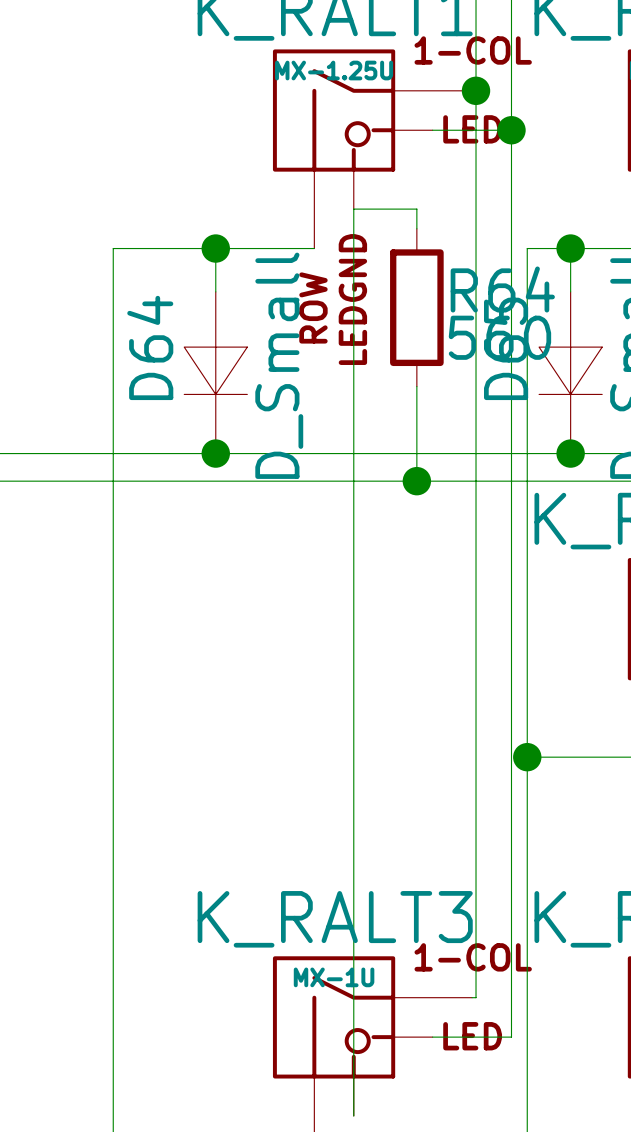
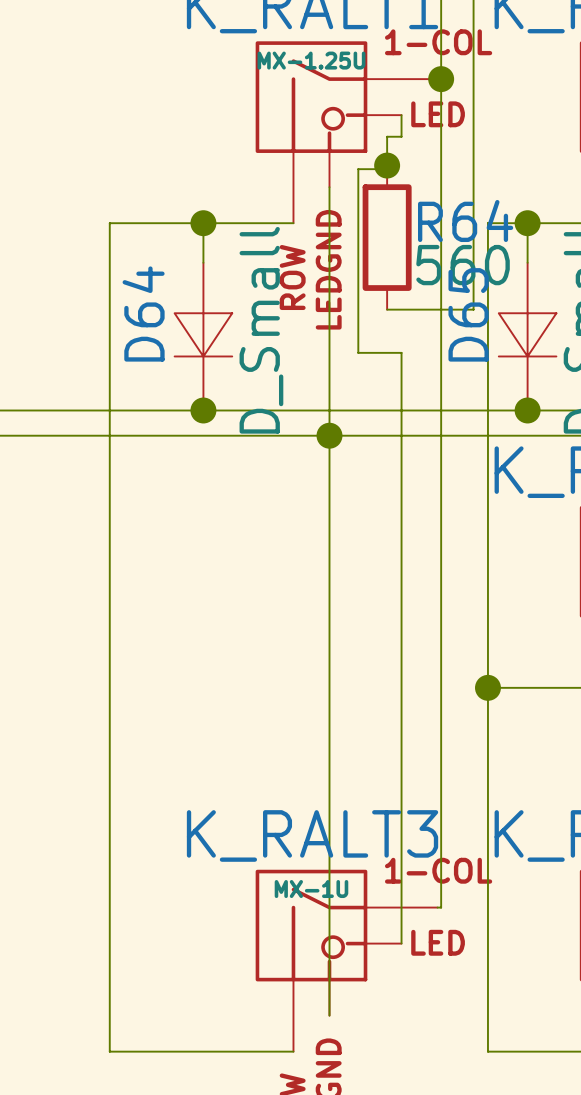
wire: (432, 130) (511, 130) -> none
junction position: (511, 130) -> (387, 165)
wire: (353, 209) (416, 209) (416, 228) -> none
R64 position: (416, 307) -> (387, 237)
wire: none -> (387, 309) (473, 309)
wire: (511, 343) (511, 1037) (432, 1037) -> (401, 115) (401, 136) (387, 136) (387, 169) (358, 169) (358, 352) (401, 352) (401, 943)
wire: (416, 386) (416, 481) -> none
junction position: (416, 481) -> (329, 435)

